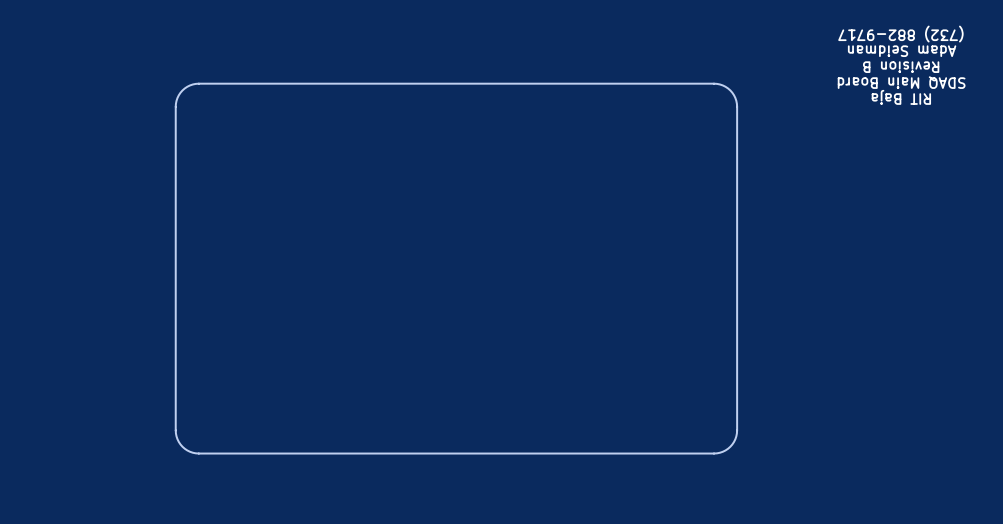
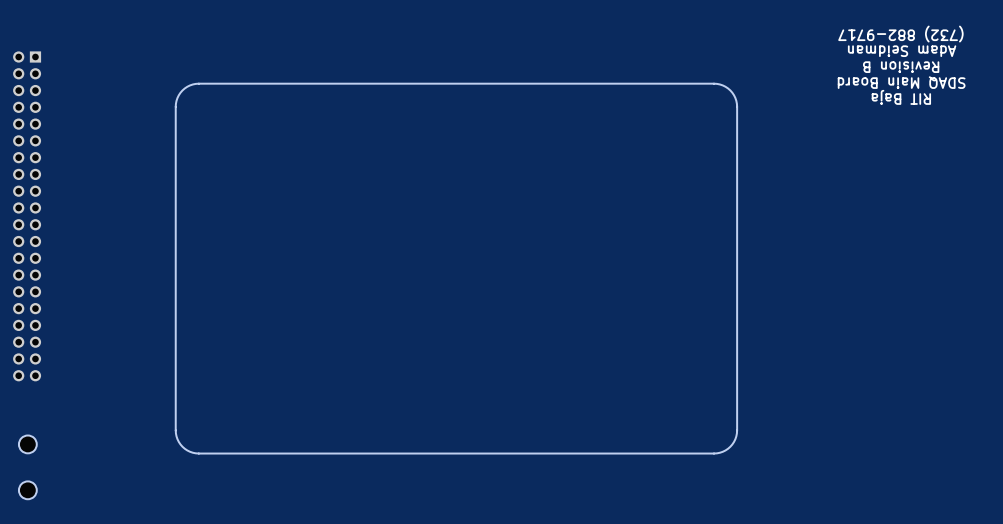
part: none -> (27, 216)
part: none -> (27, 444)
part: none -> (27, 490)

